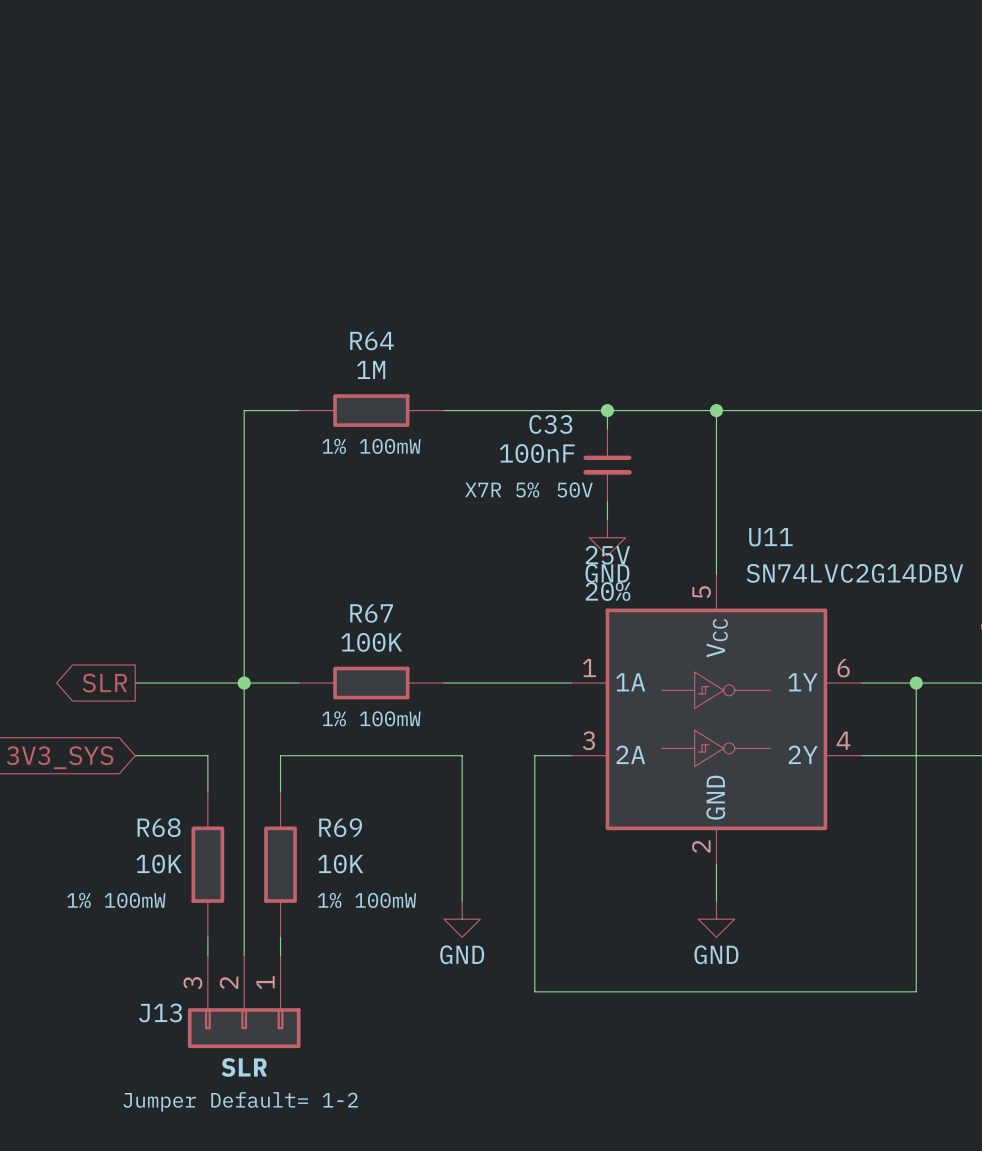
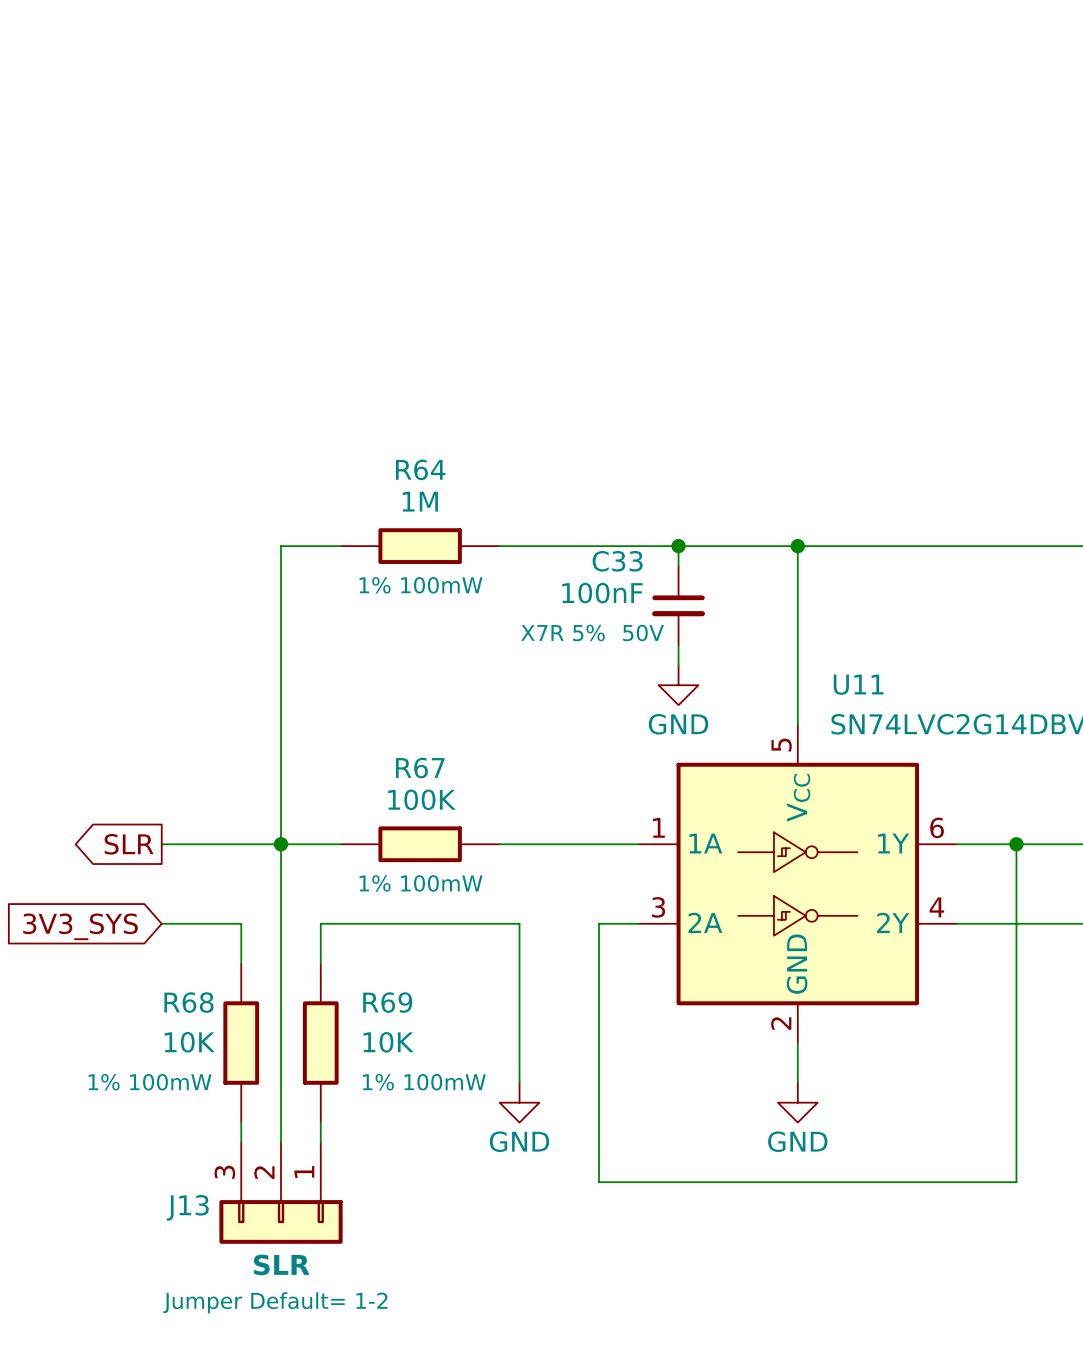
C33 text: 25V (607, 555) -> none
C33 text: 20% (608, 591) -> none

